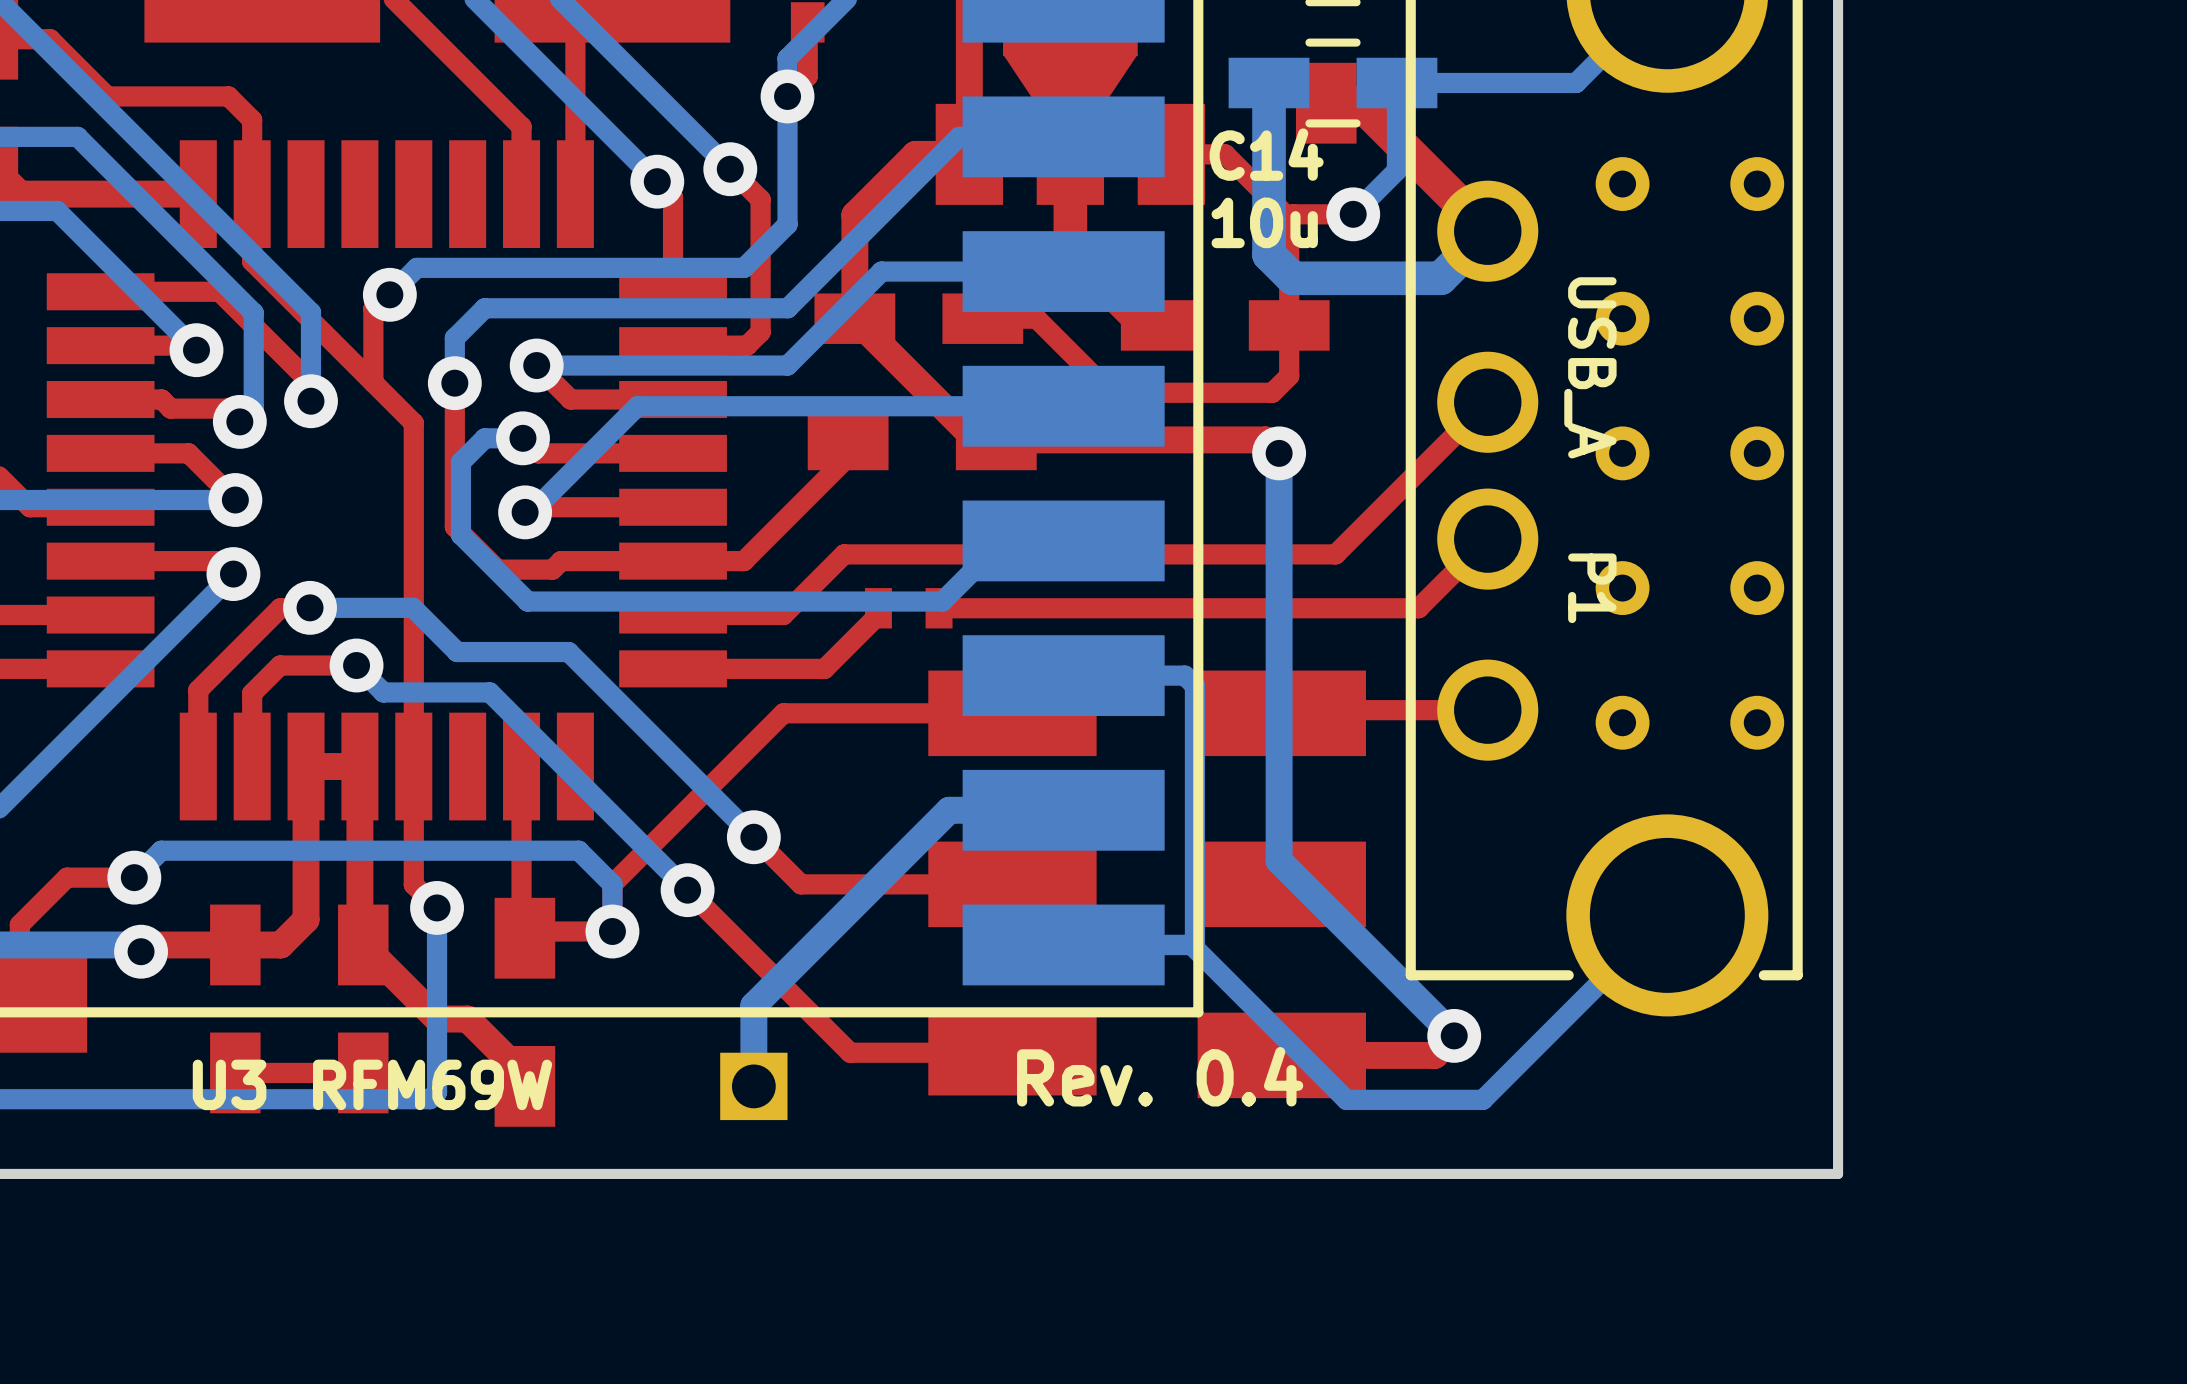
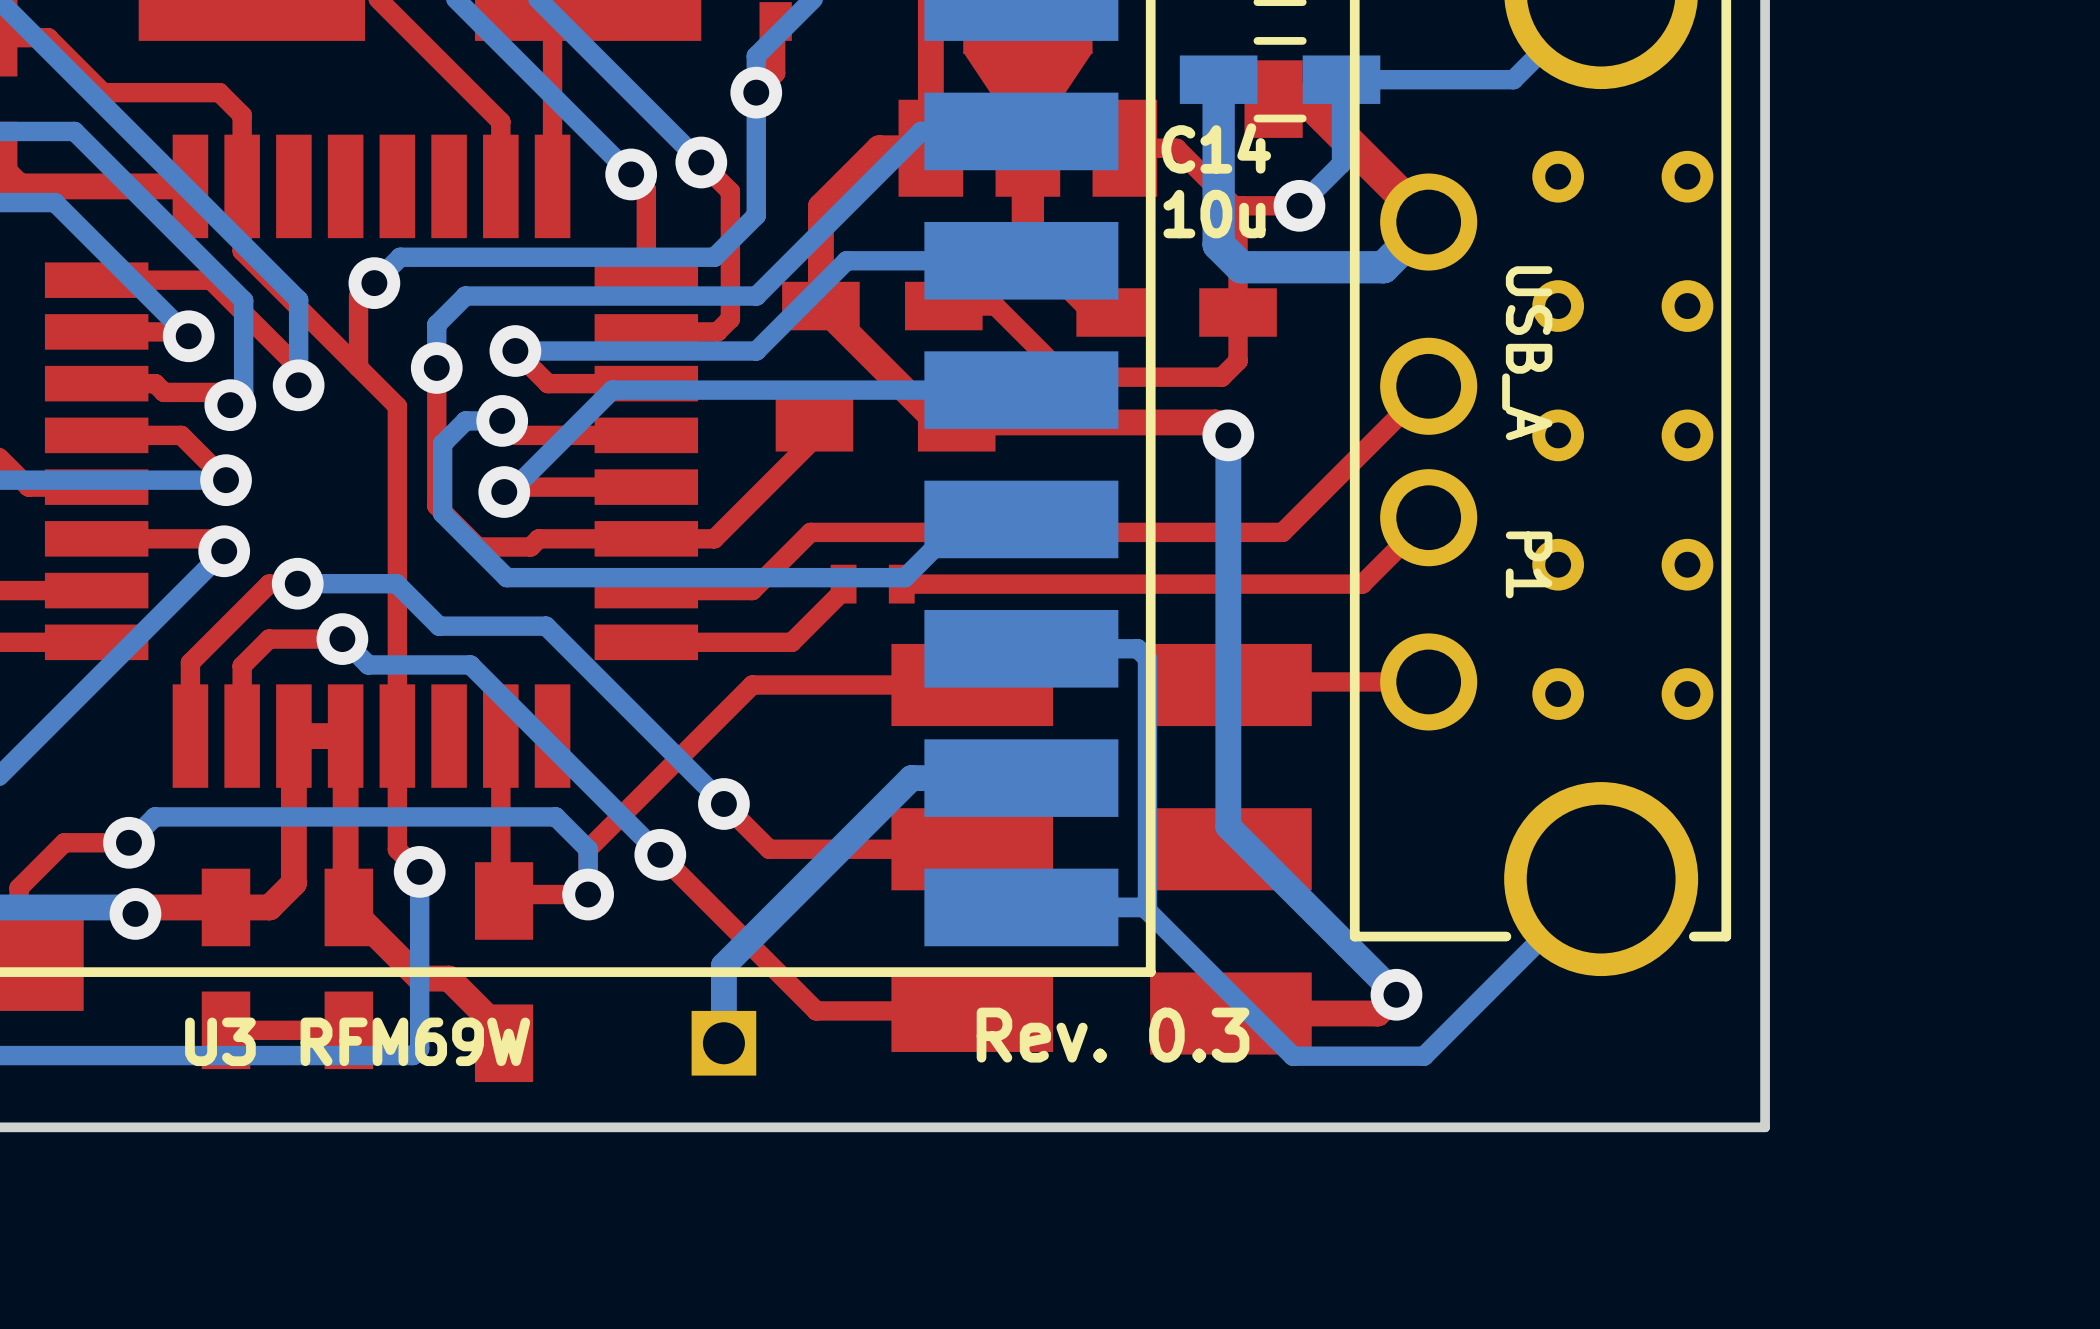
text: Rev. 0.4 (1160, 1076) -> Rev. 0.3 (1113, 1035)

